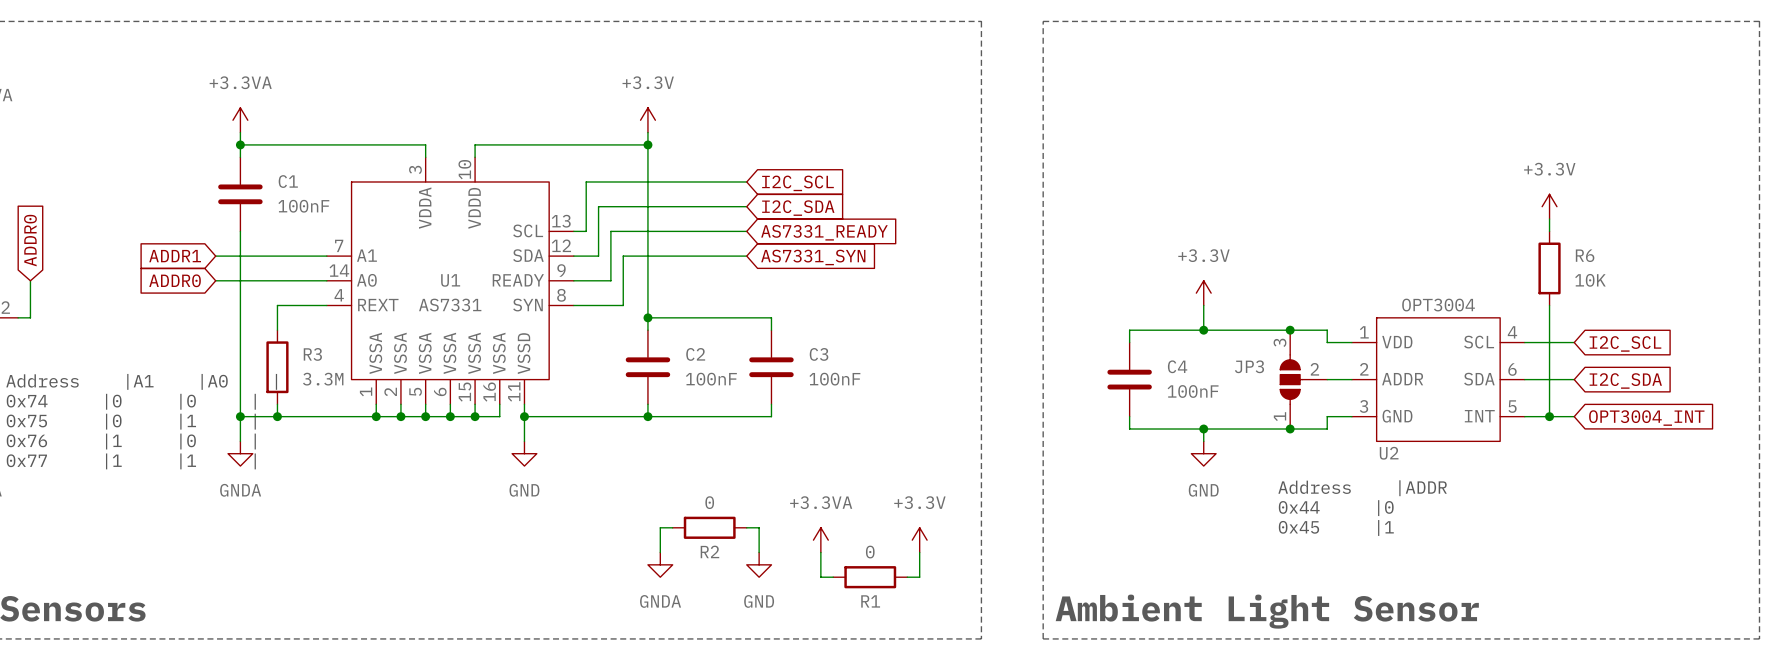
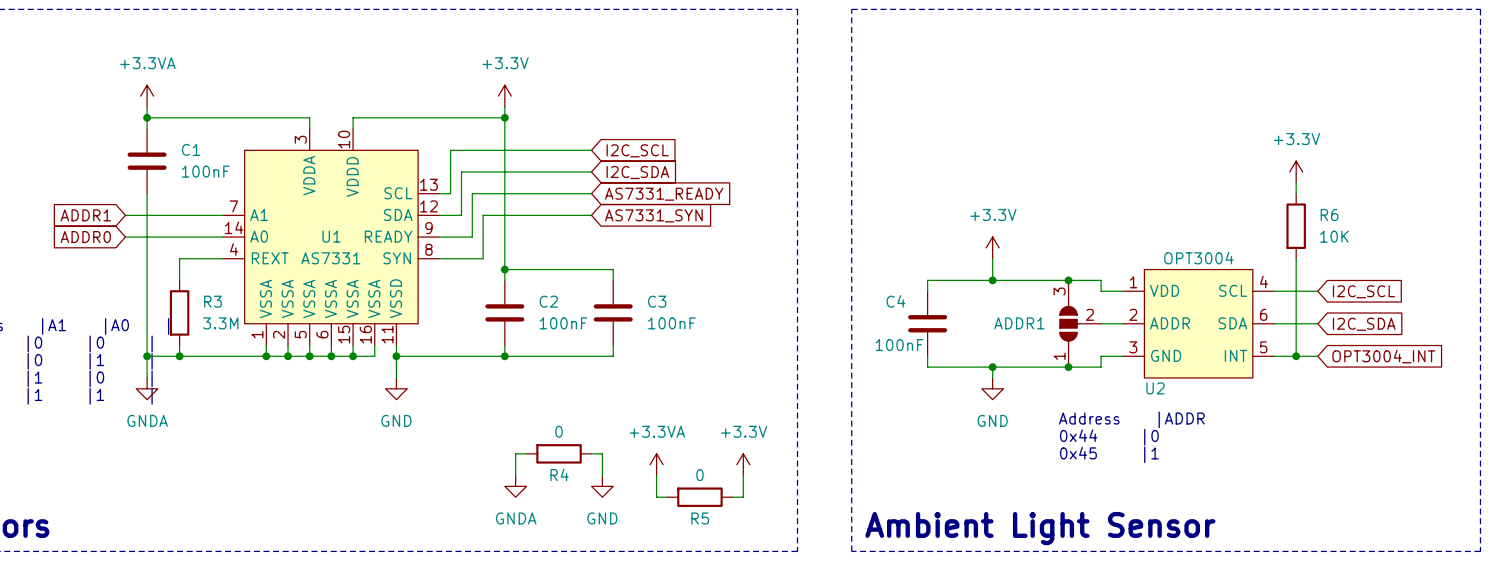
C4 name position: C4 (1177, 366) -> C4 (895, 301)
JP3 name: JP3 (1249, 366) -> ADDR1 (1019, 323)
C4 value position: 100nF (1193, 391) -> 100nF (899, 345)
R2 name: R2 (709, 551) -> R4 (559, 474)
R1 name: R1 (870, 601) -> R5 (700, 518)

